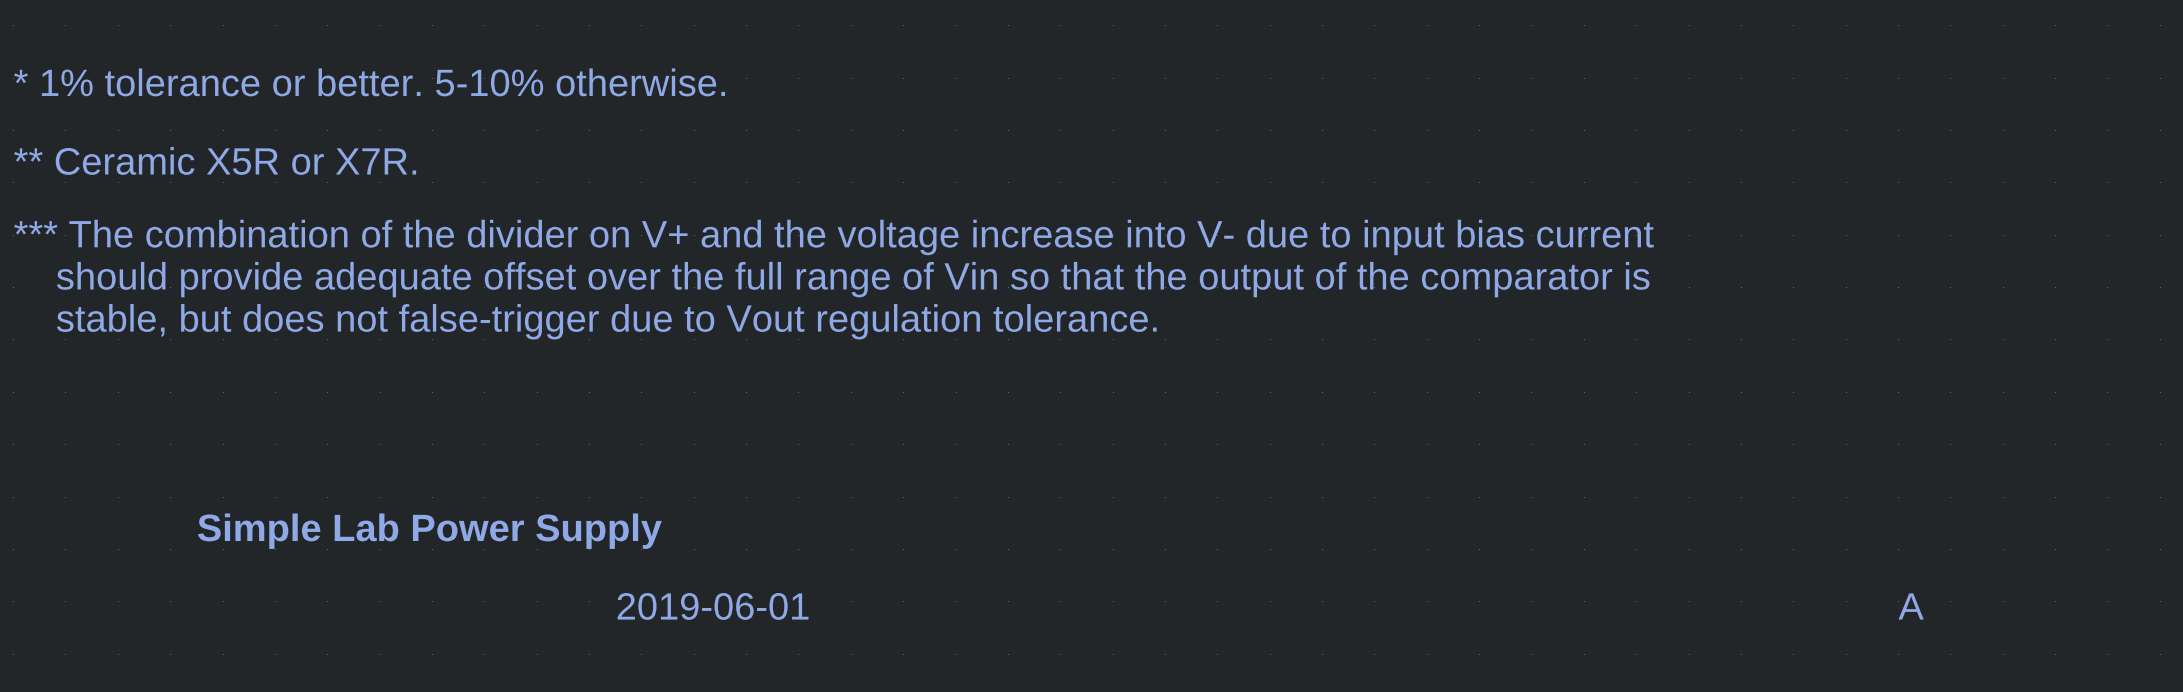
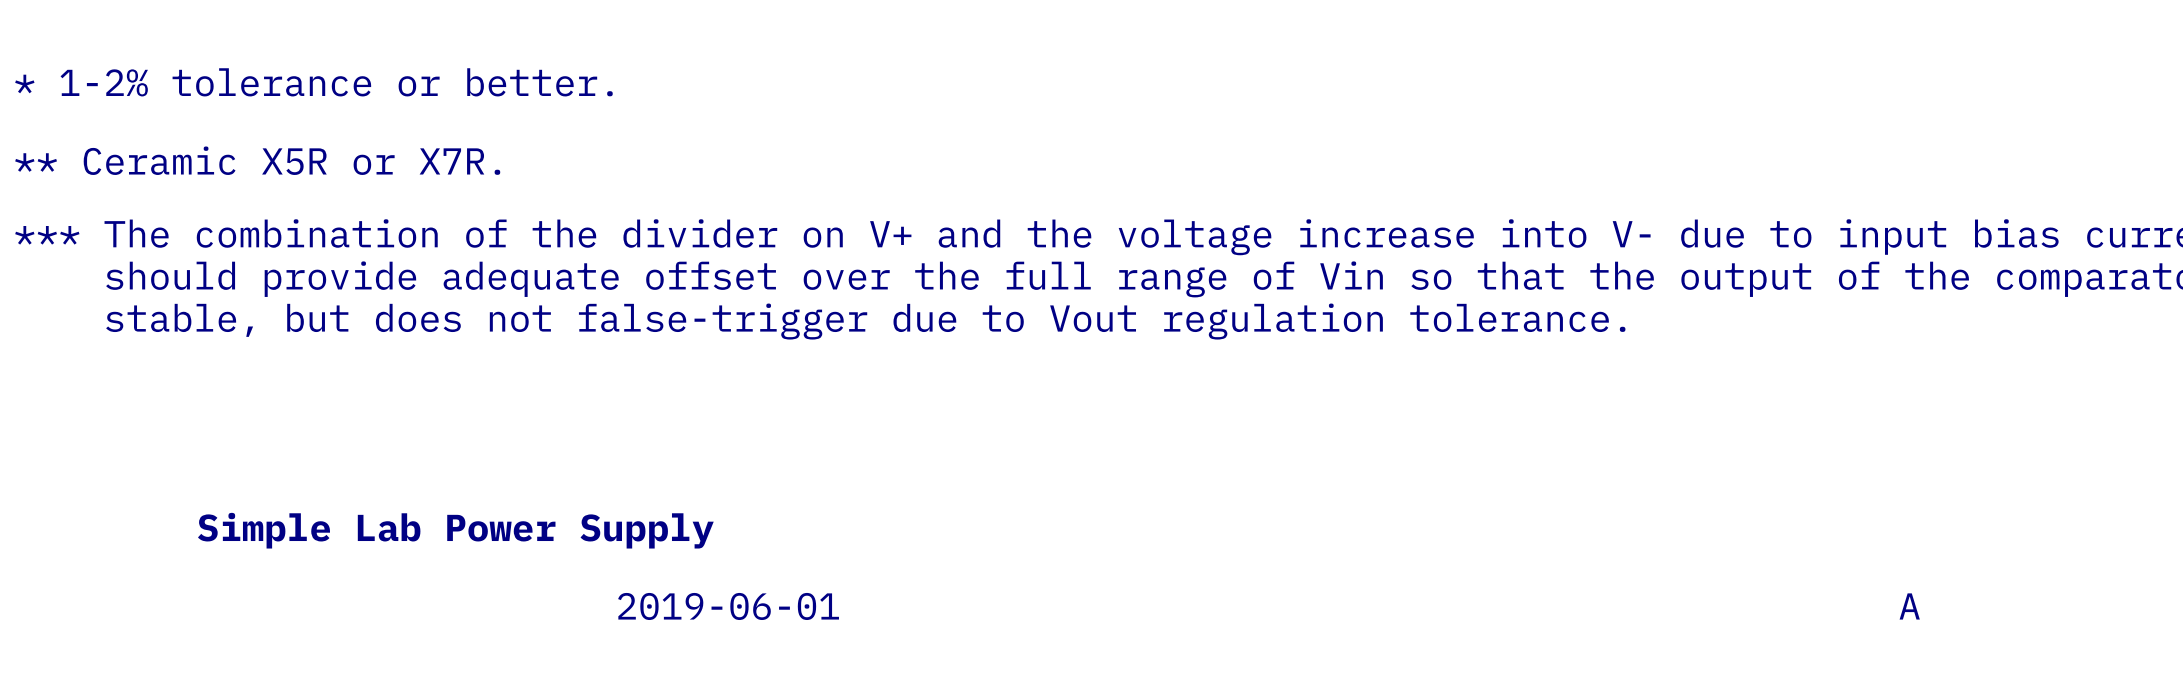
text: * 1% tolerance or better. 5-10% otherwise. (369, 82) -> * 1-2% tolerance or better. (313, 82)

